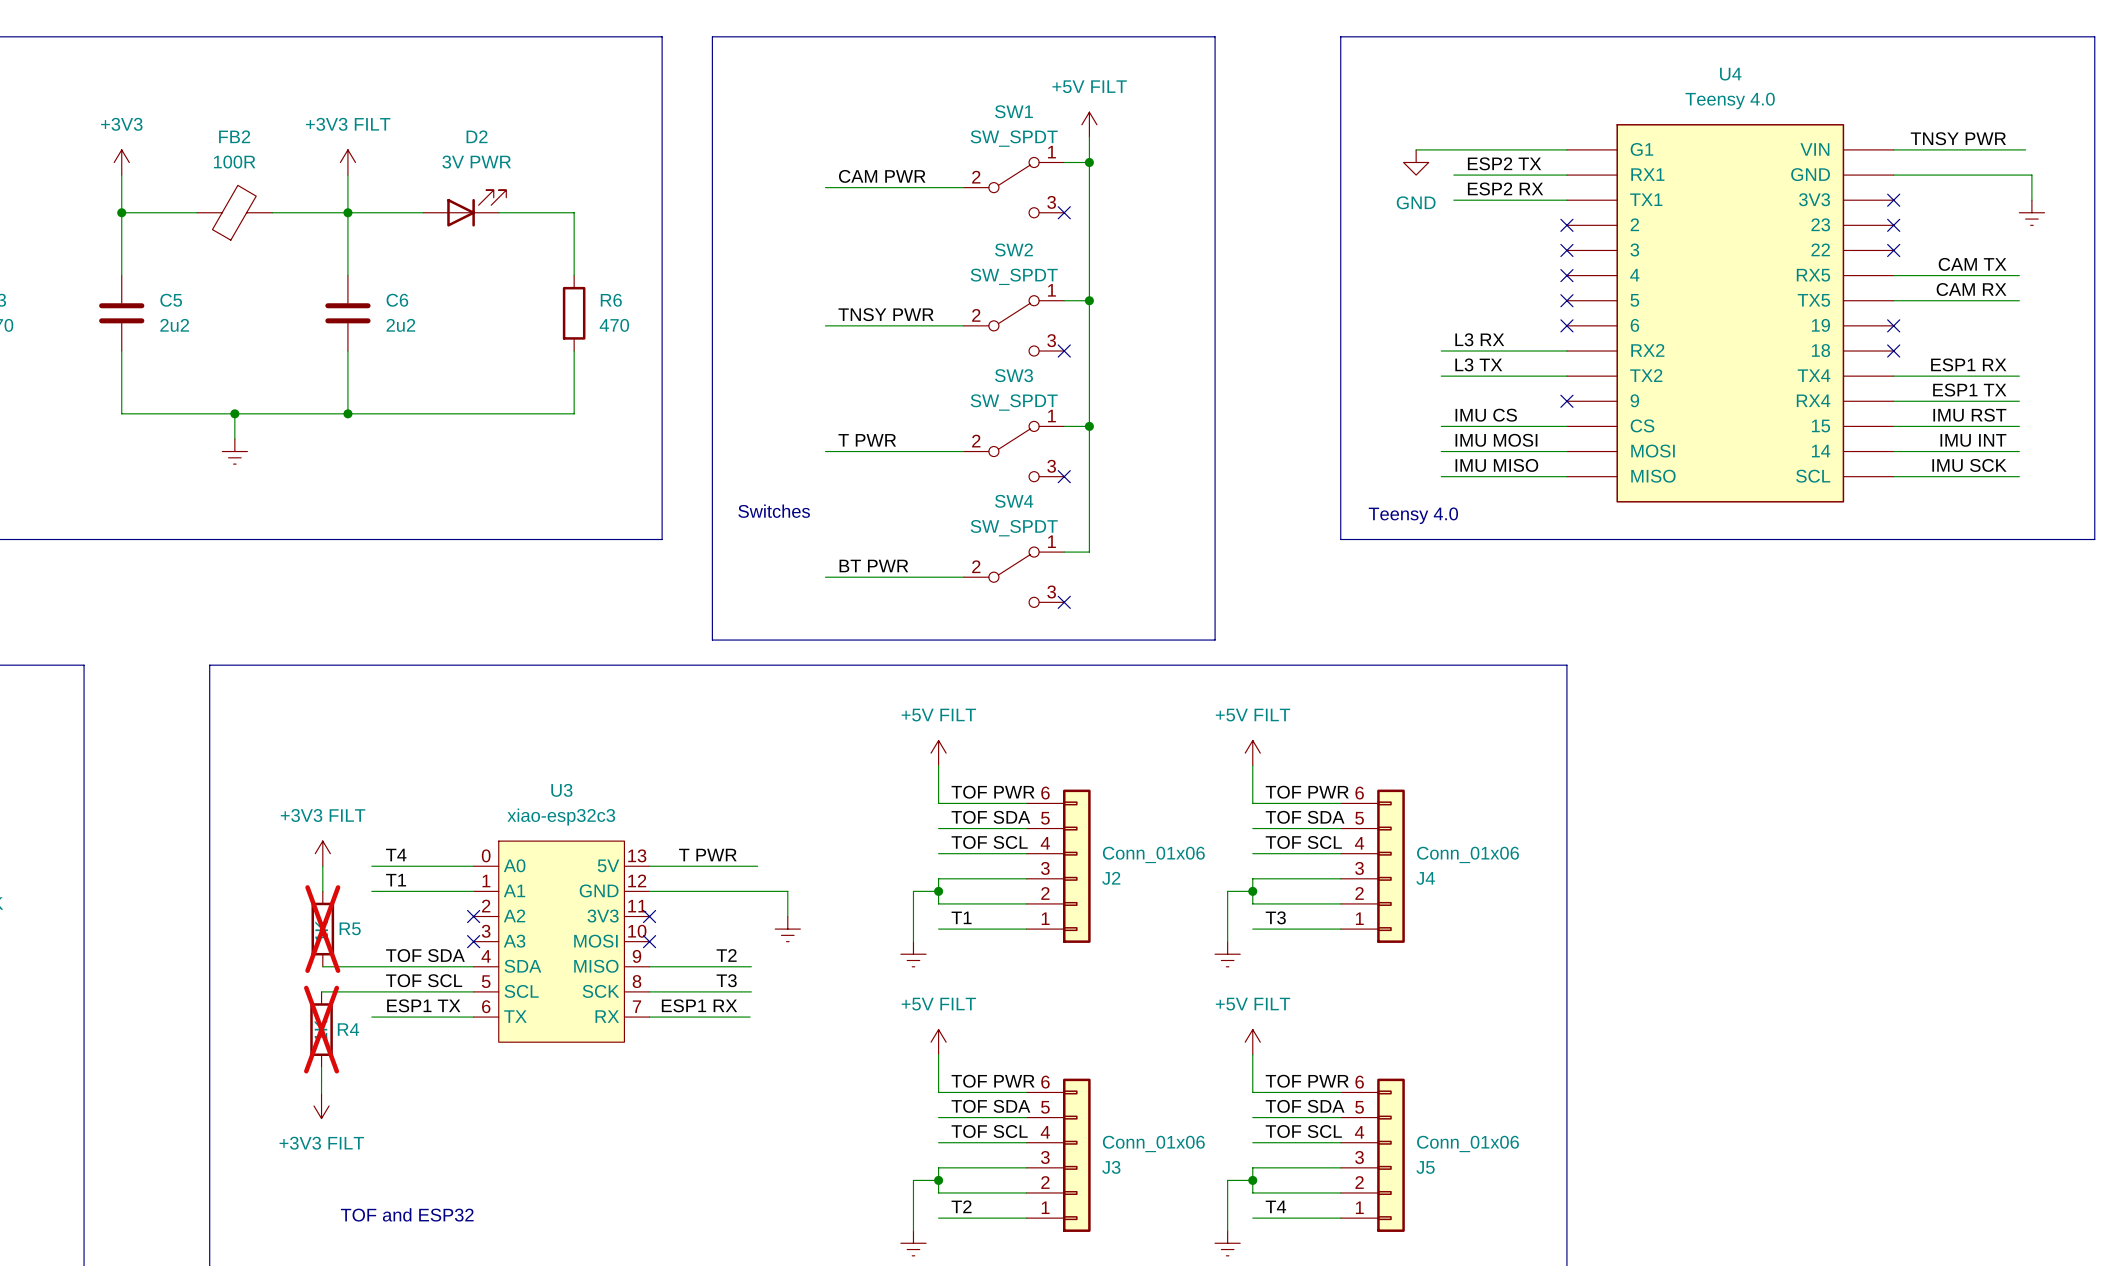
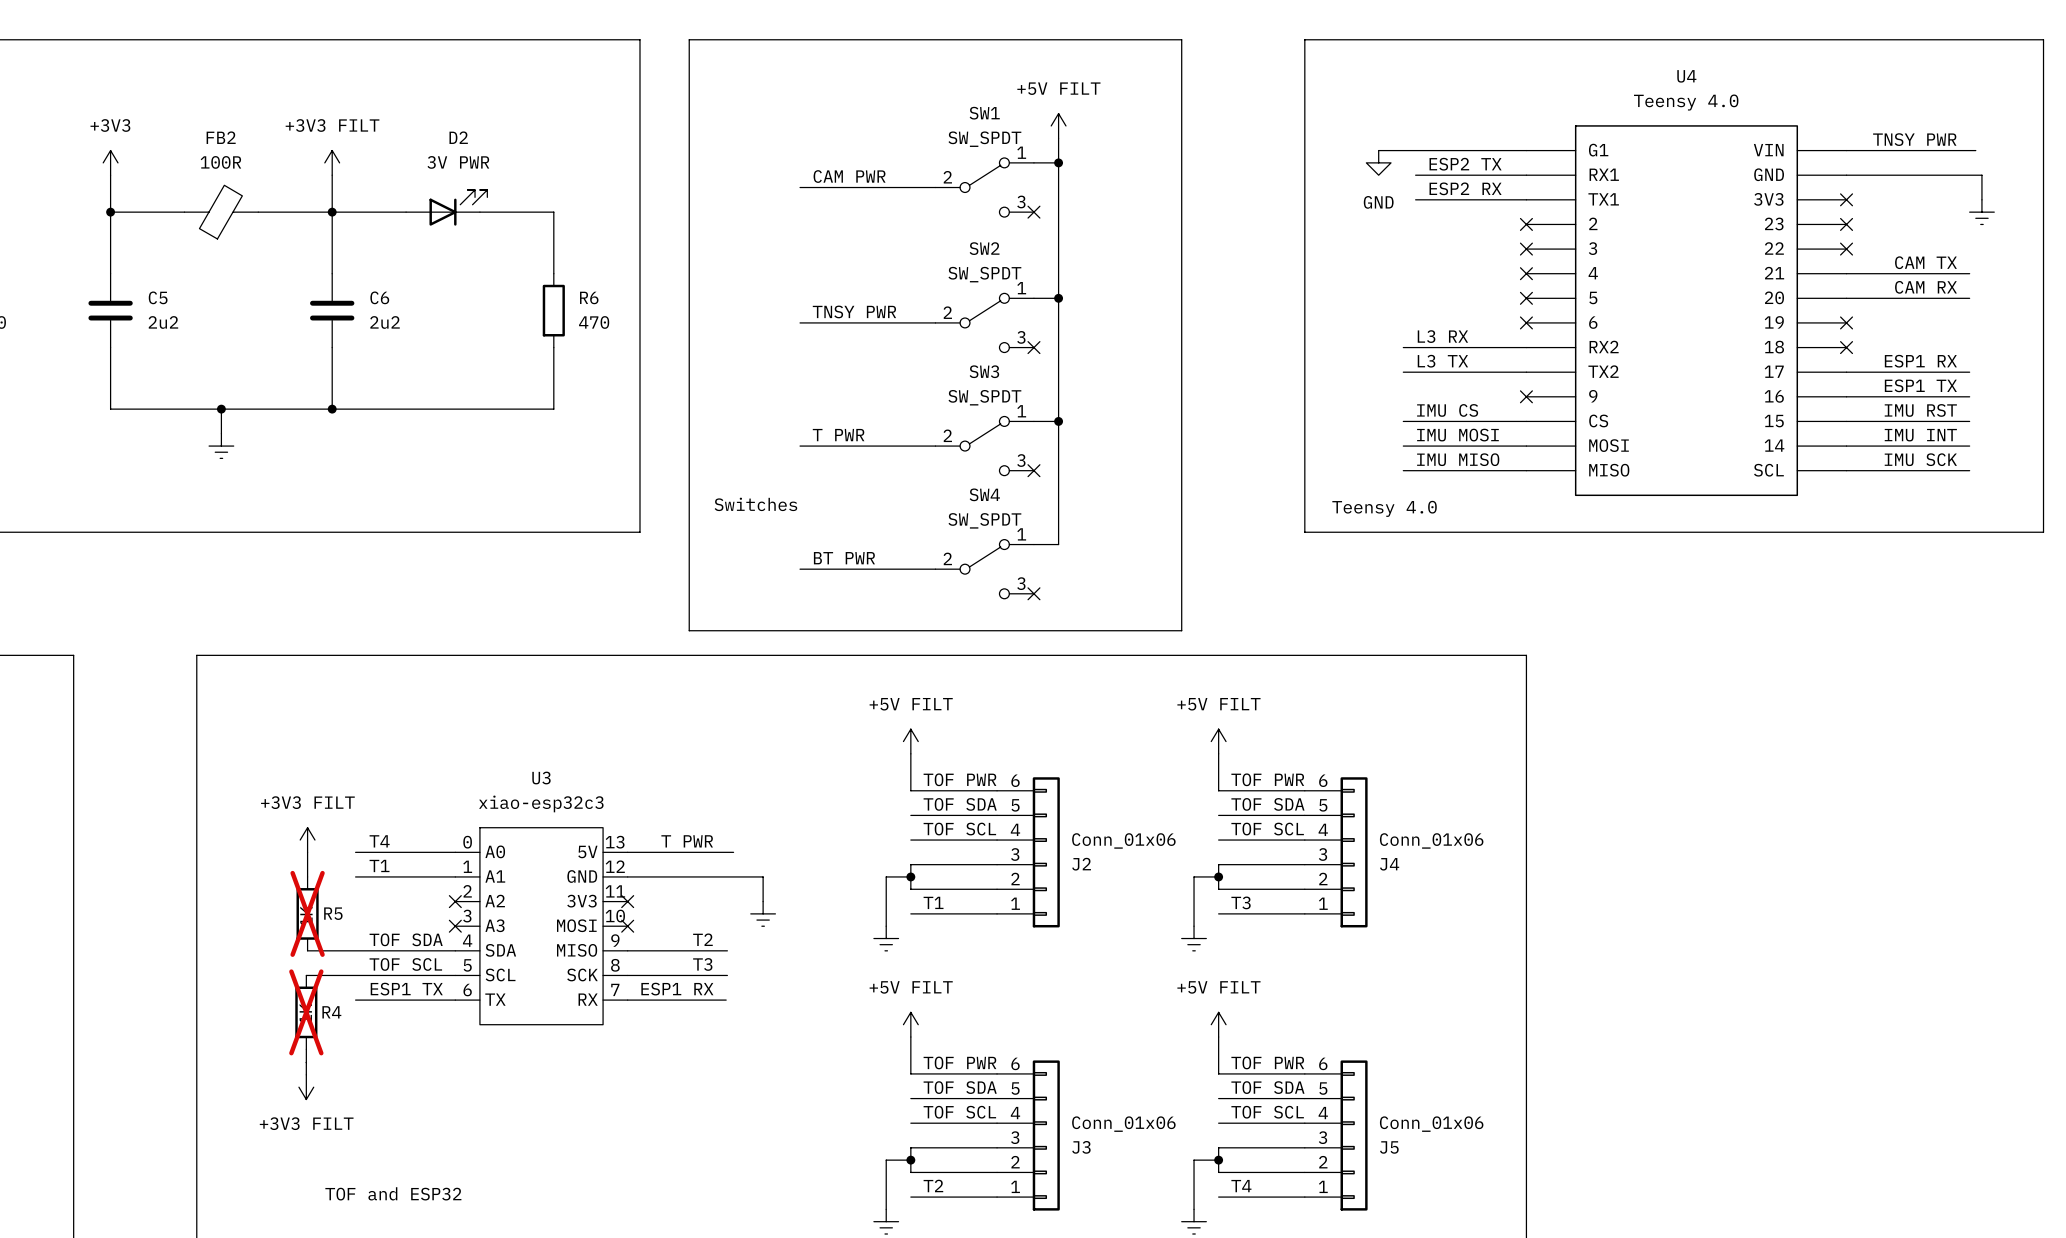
U4 pin name: RX5 (1813, 275) -> 21 (1774, 273)
U4 pin name: TX5 (1813, 300) -> 20 (1774, 297)
U4 pin name: TX4 (1814, 375) -> 17 (1774, 371)
U4 pin name: RX4 (1813, 400) -> 16 (1774, 396)

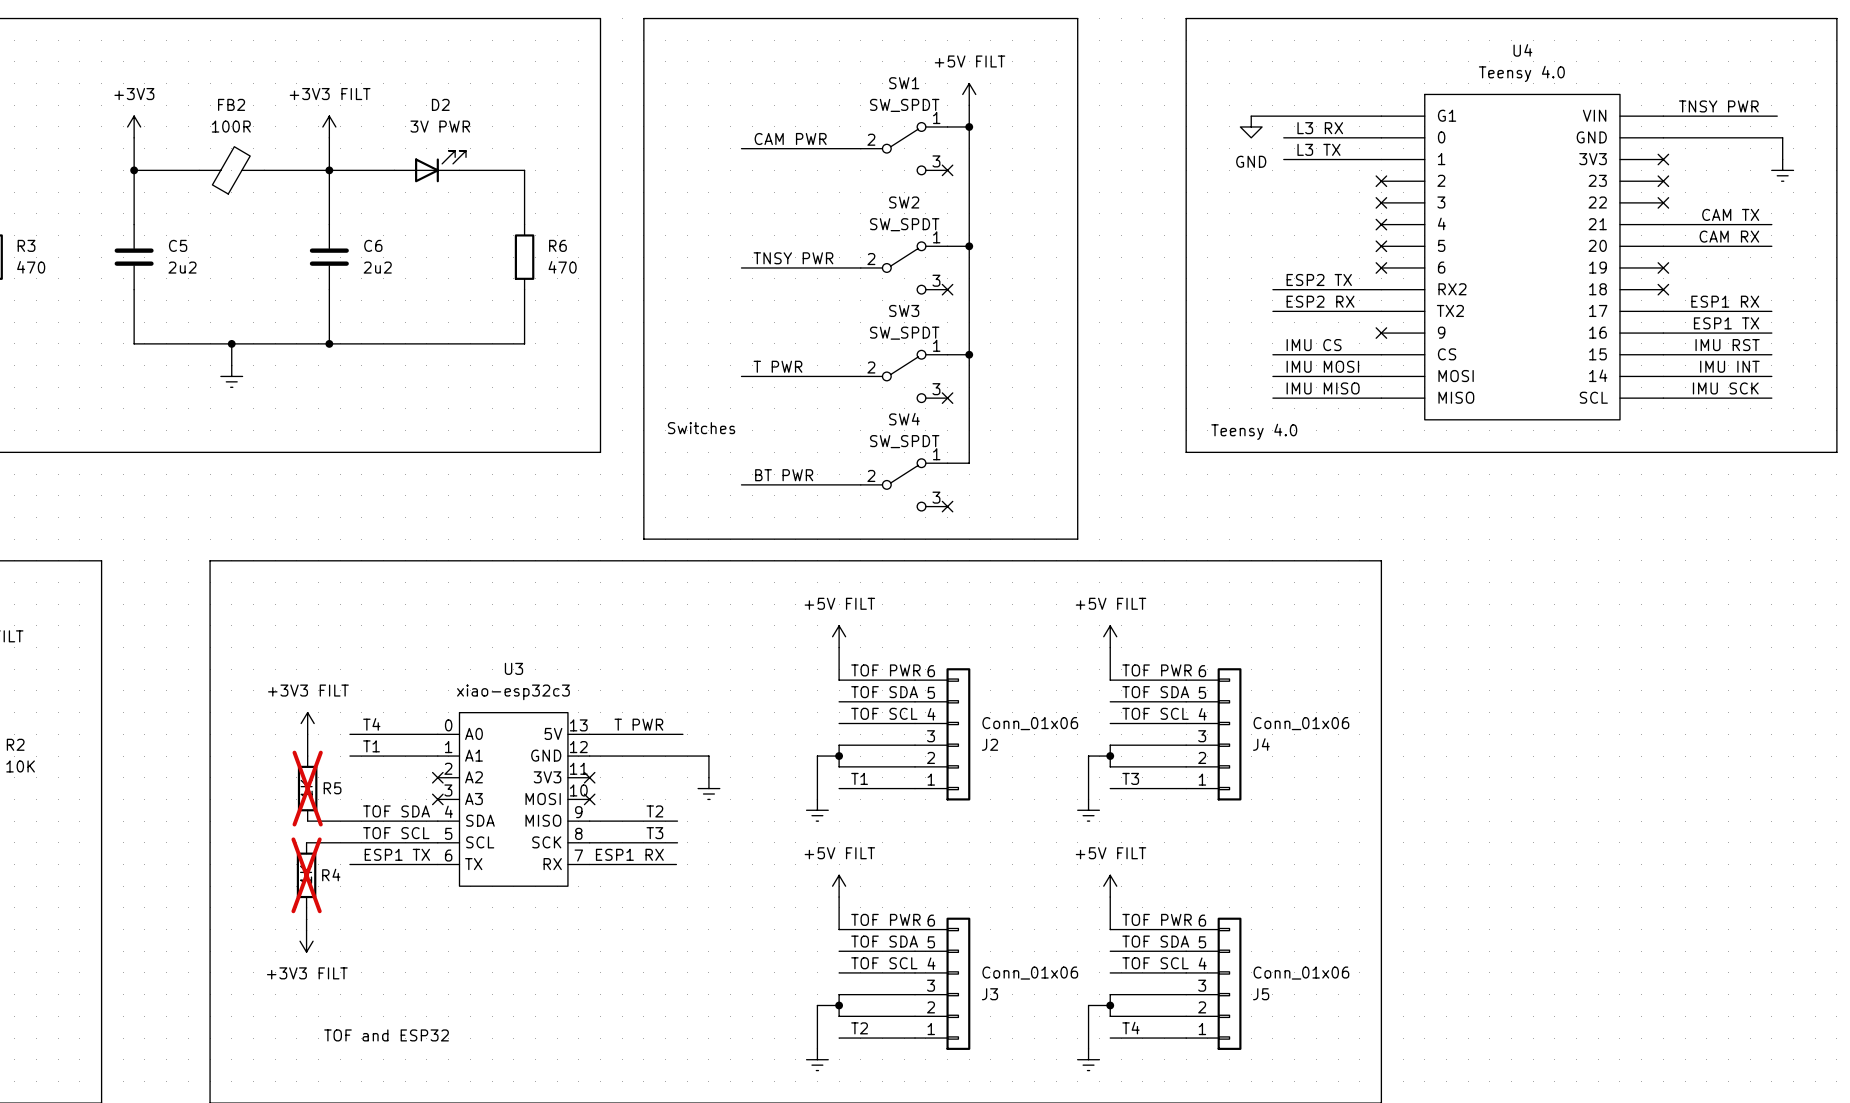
label: ESP2 TX (1465, 164) -> L3 RX (1320, 128)
U4 pin name: RX1 (1604, 174) -> 0 (1441, 137)
label: ESP2 RX (1465, 188) -> L3 TX (1318, 149)
U4 pin name: TX1 (1603, 199) -> 1 (1441, 159)
label: L3 RX (1442, 336) -> ESP2 TX (1319, 279)
label: L3 TX (1442, 361) -> ESP2 RX (1320, 301)

